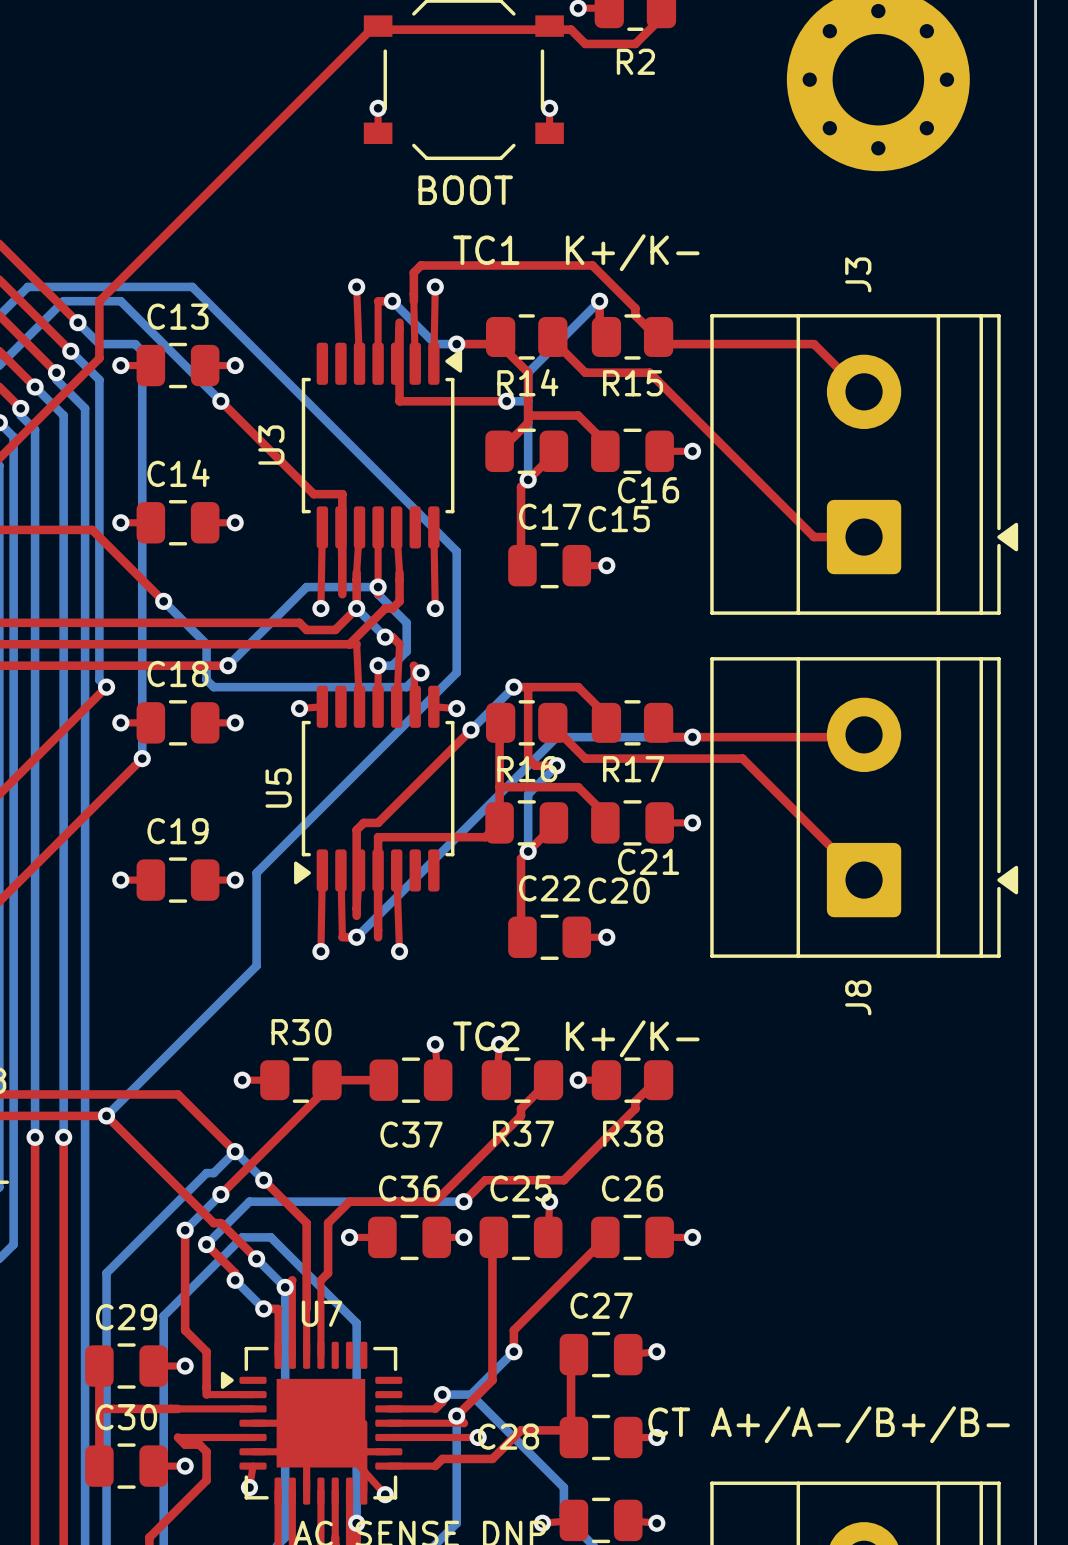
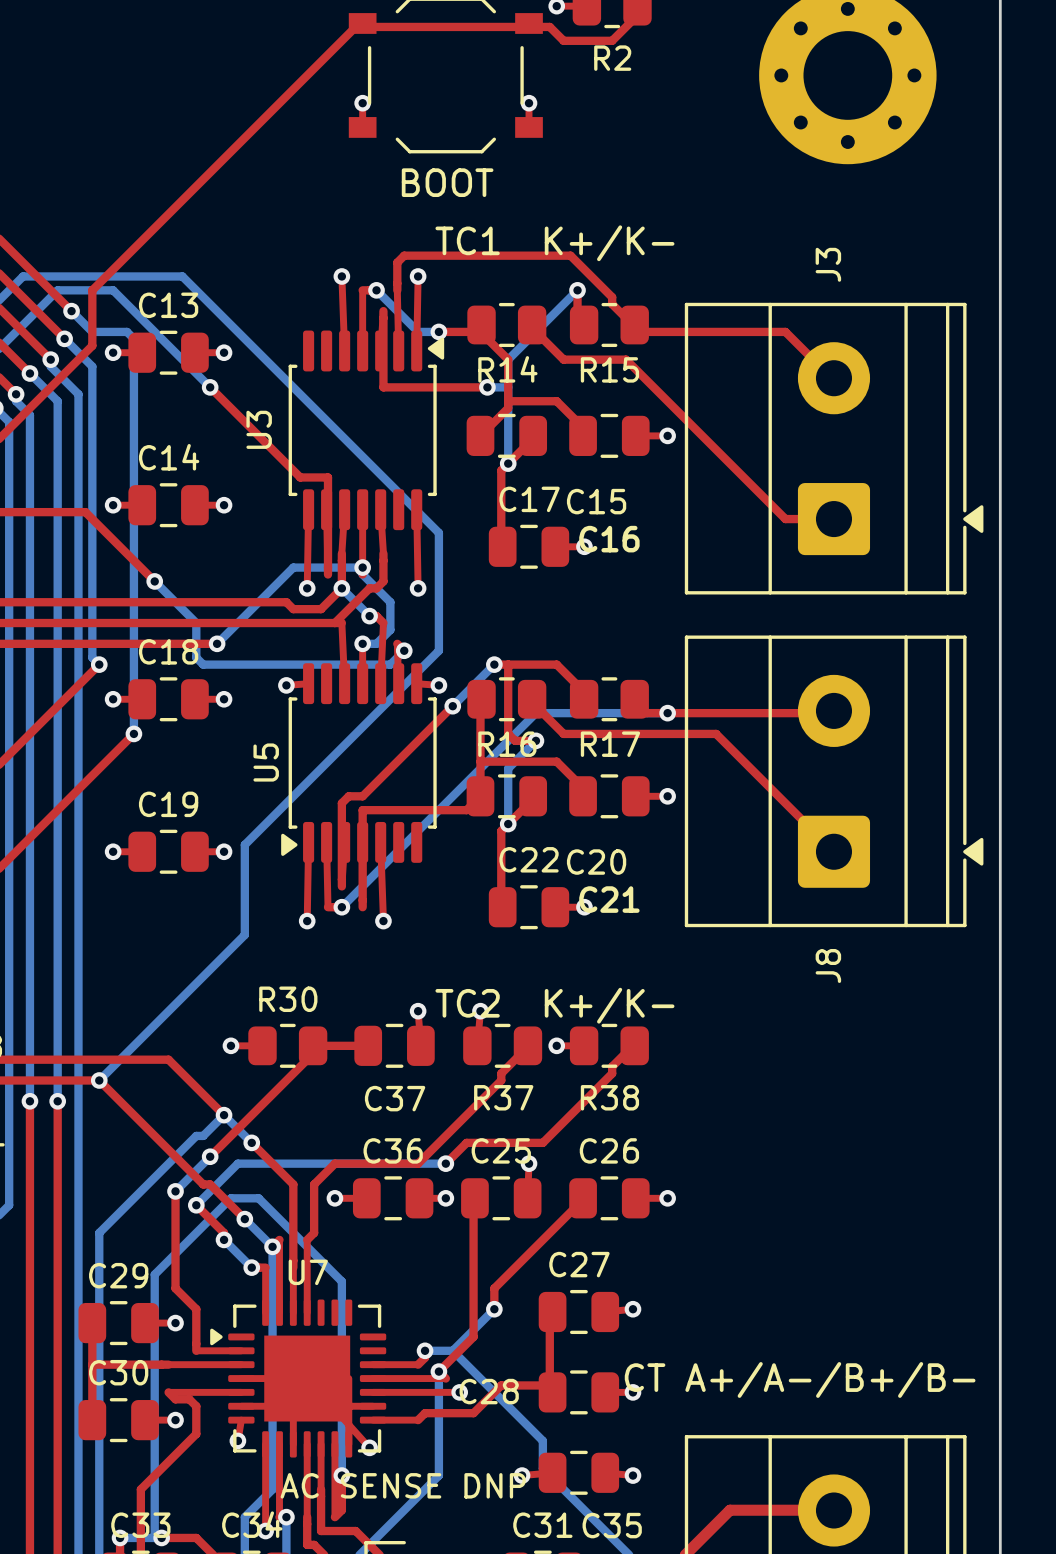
C16 name position: C16 (648, 490) -> C16 (609, 539)
C21 name position: C21 (648, 861) -> C21 (609, 899)

